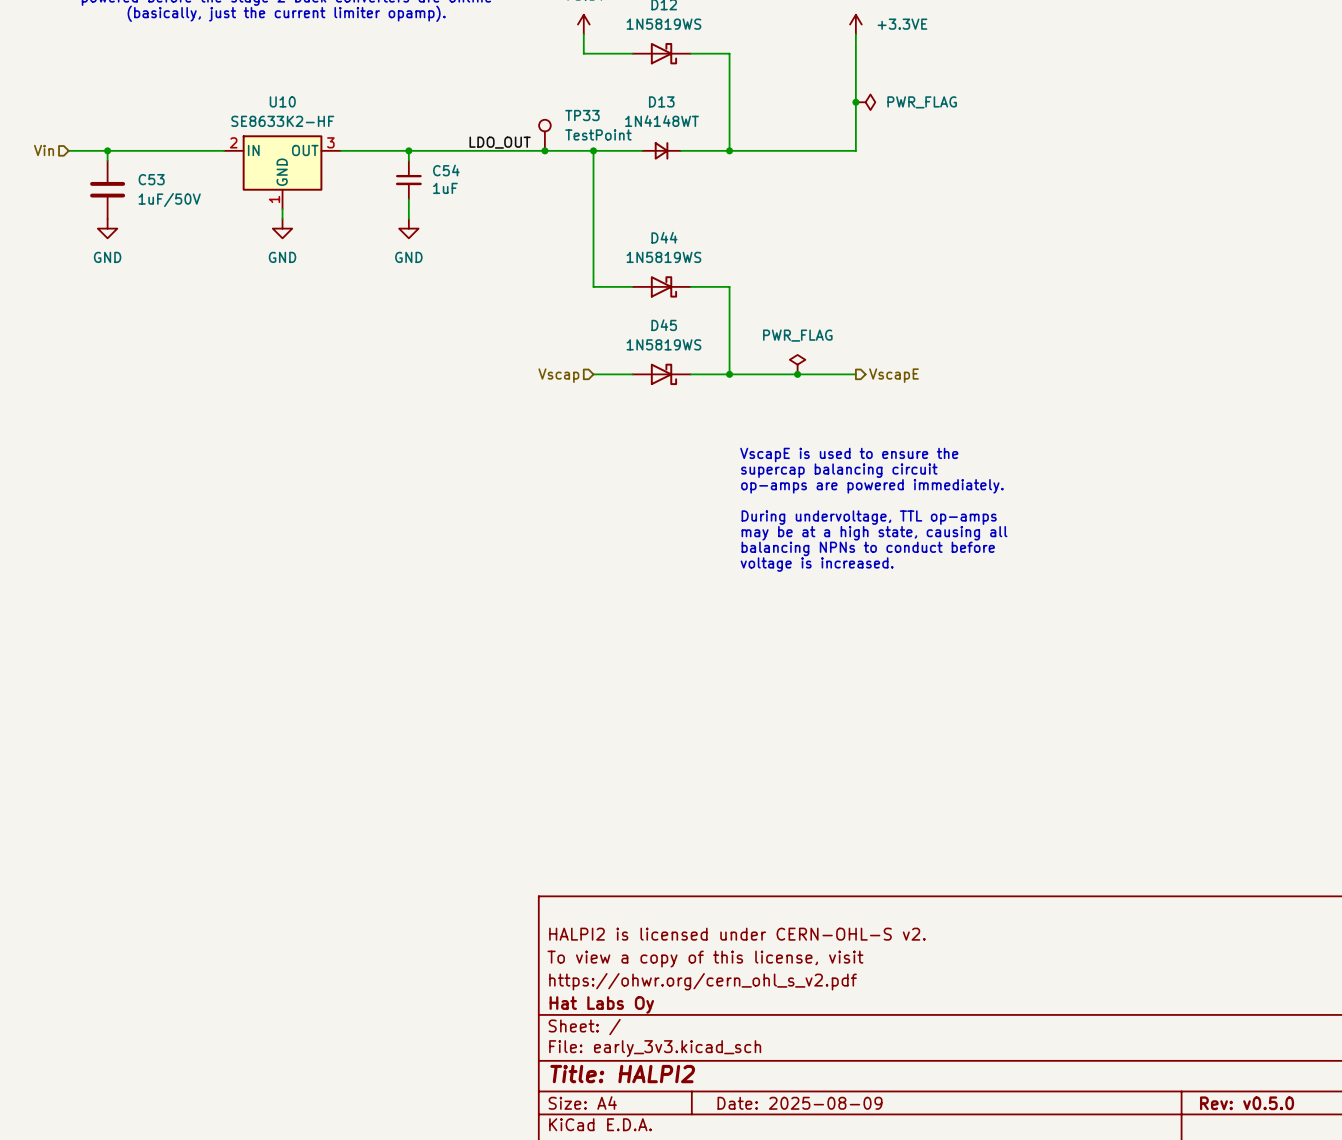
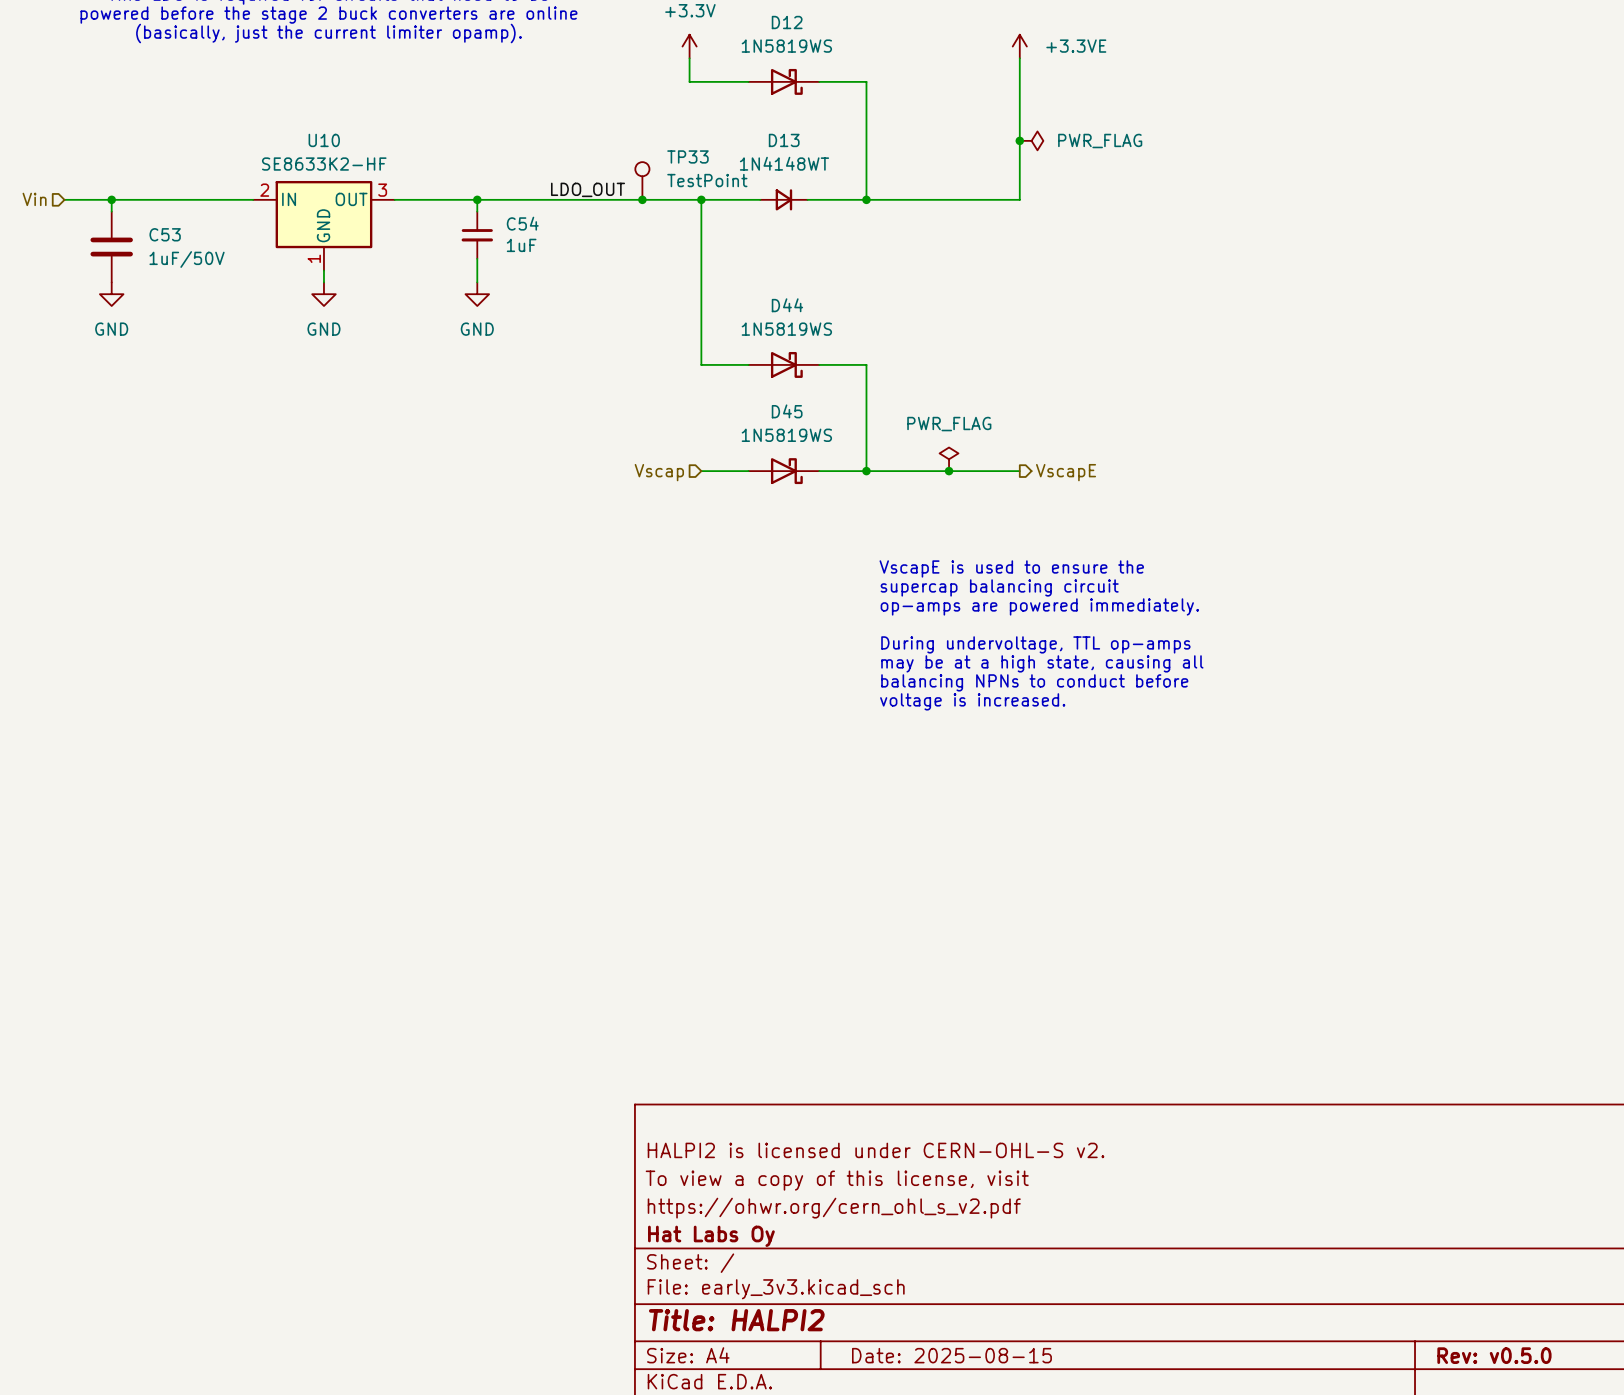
title block: Date: 2025-08-09 (800, 1103) -> Date: 2025-08-15 (951, 1355)

